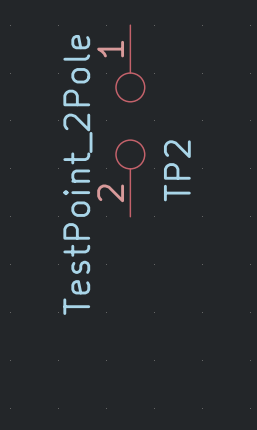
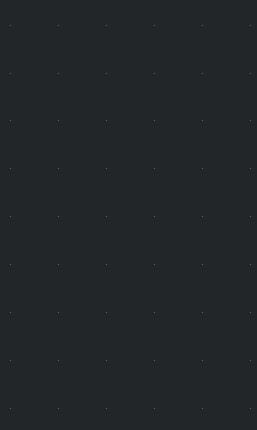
TP2: TestPoint_2Pole (130, 120) -> none

